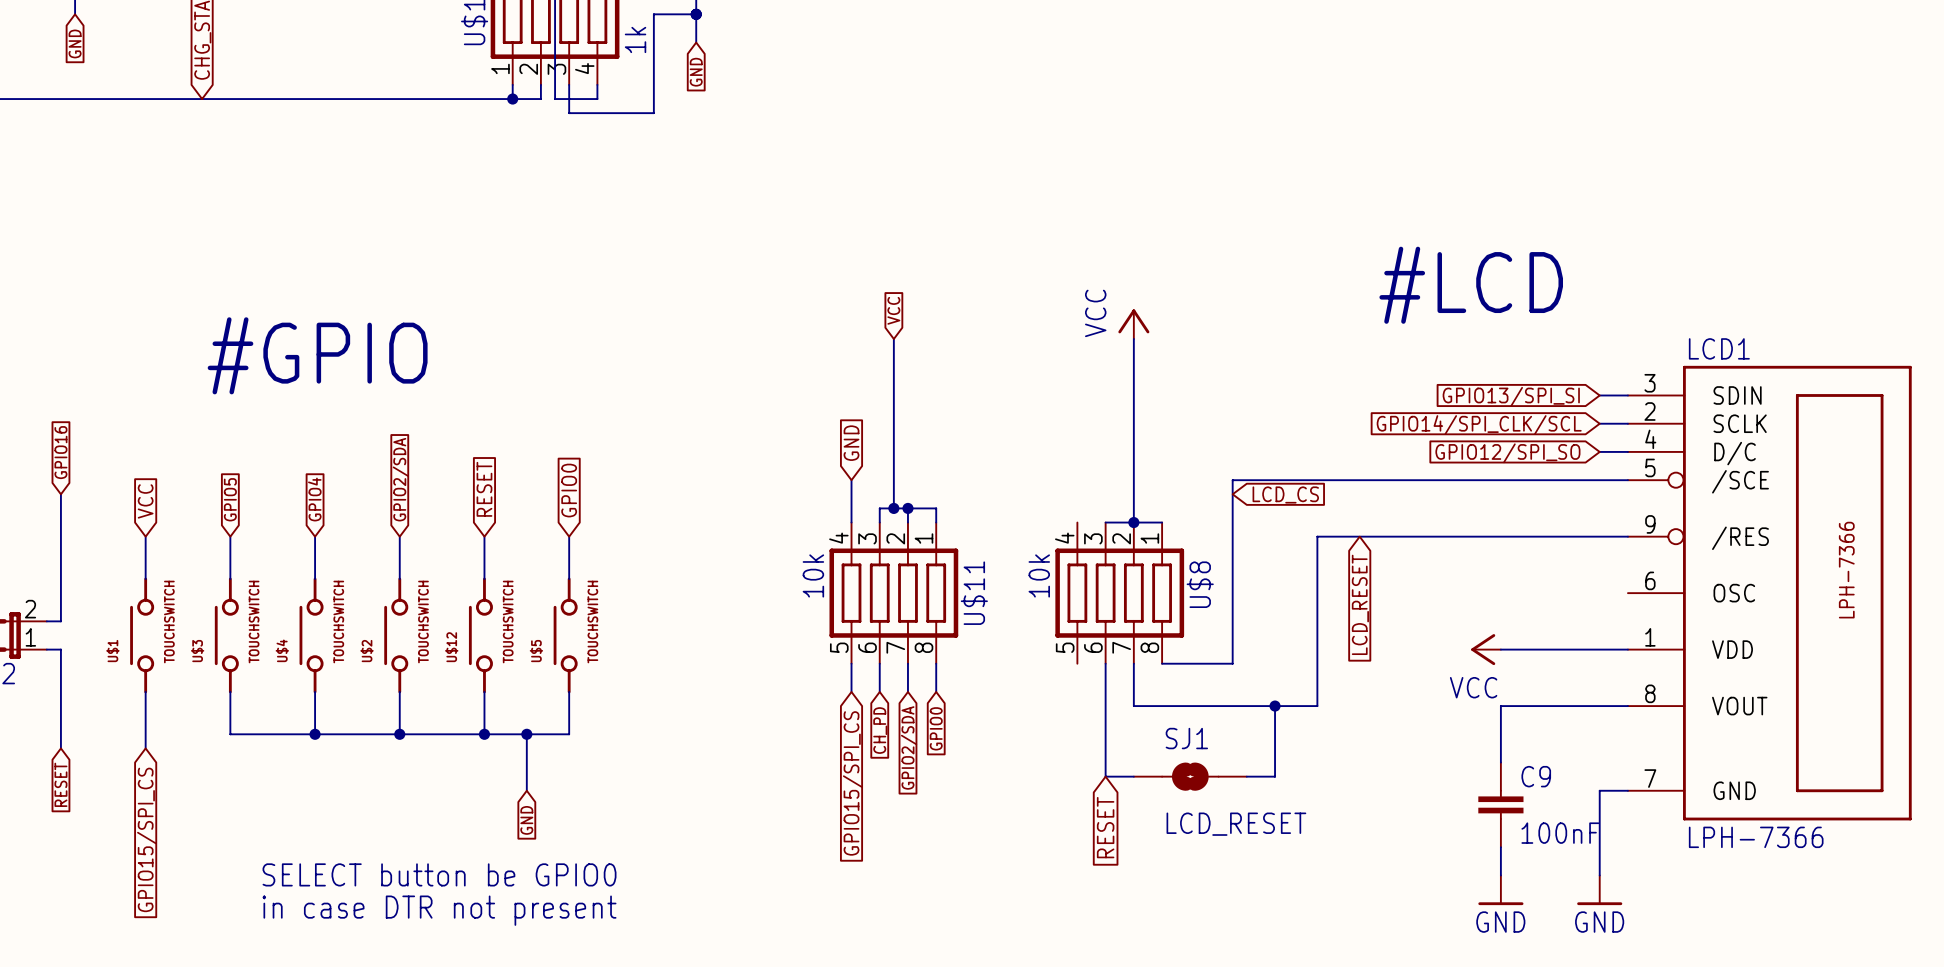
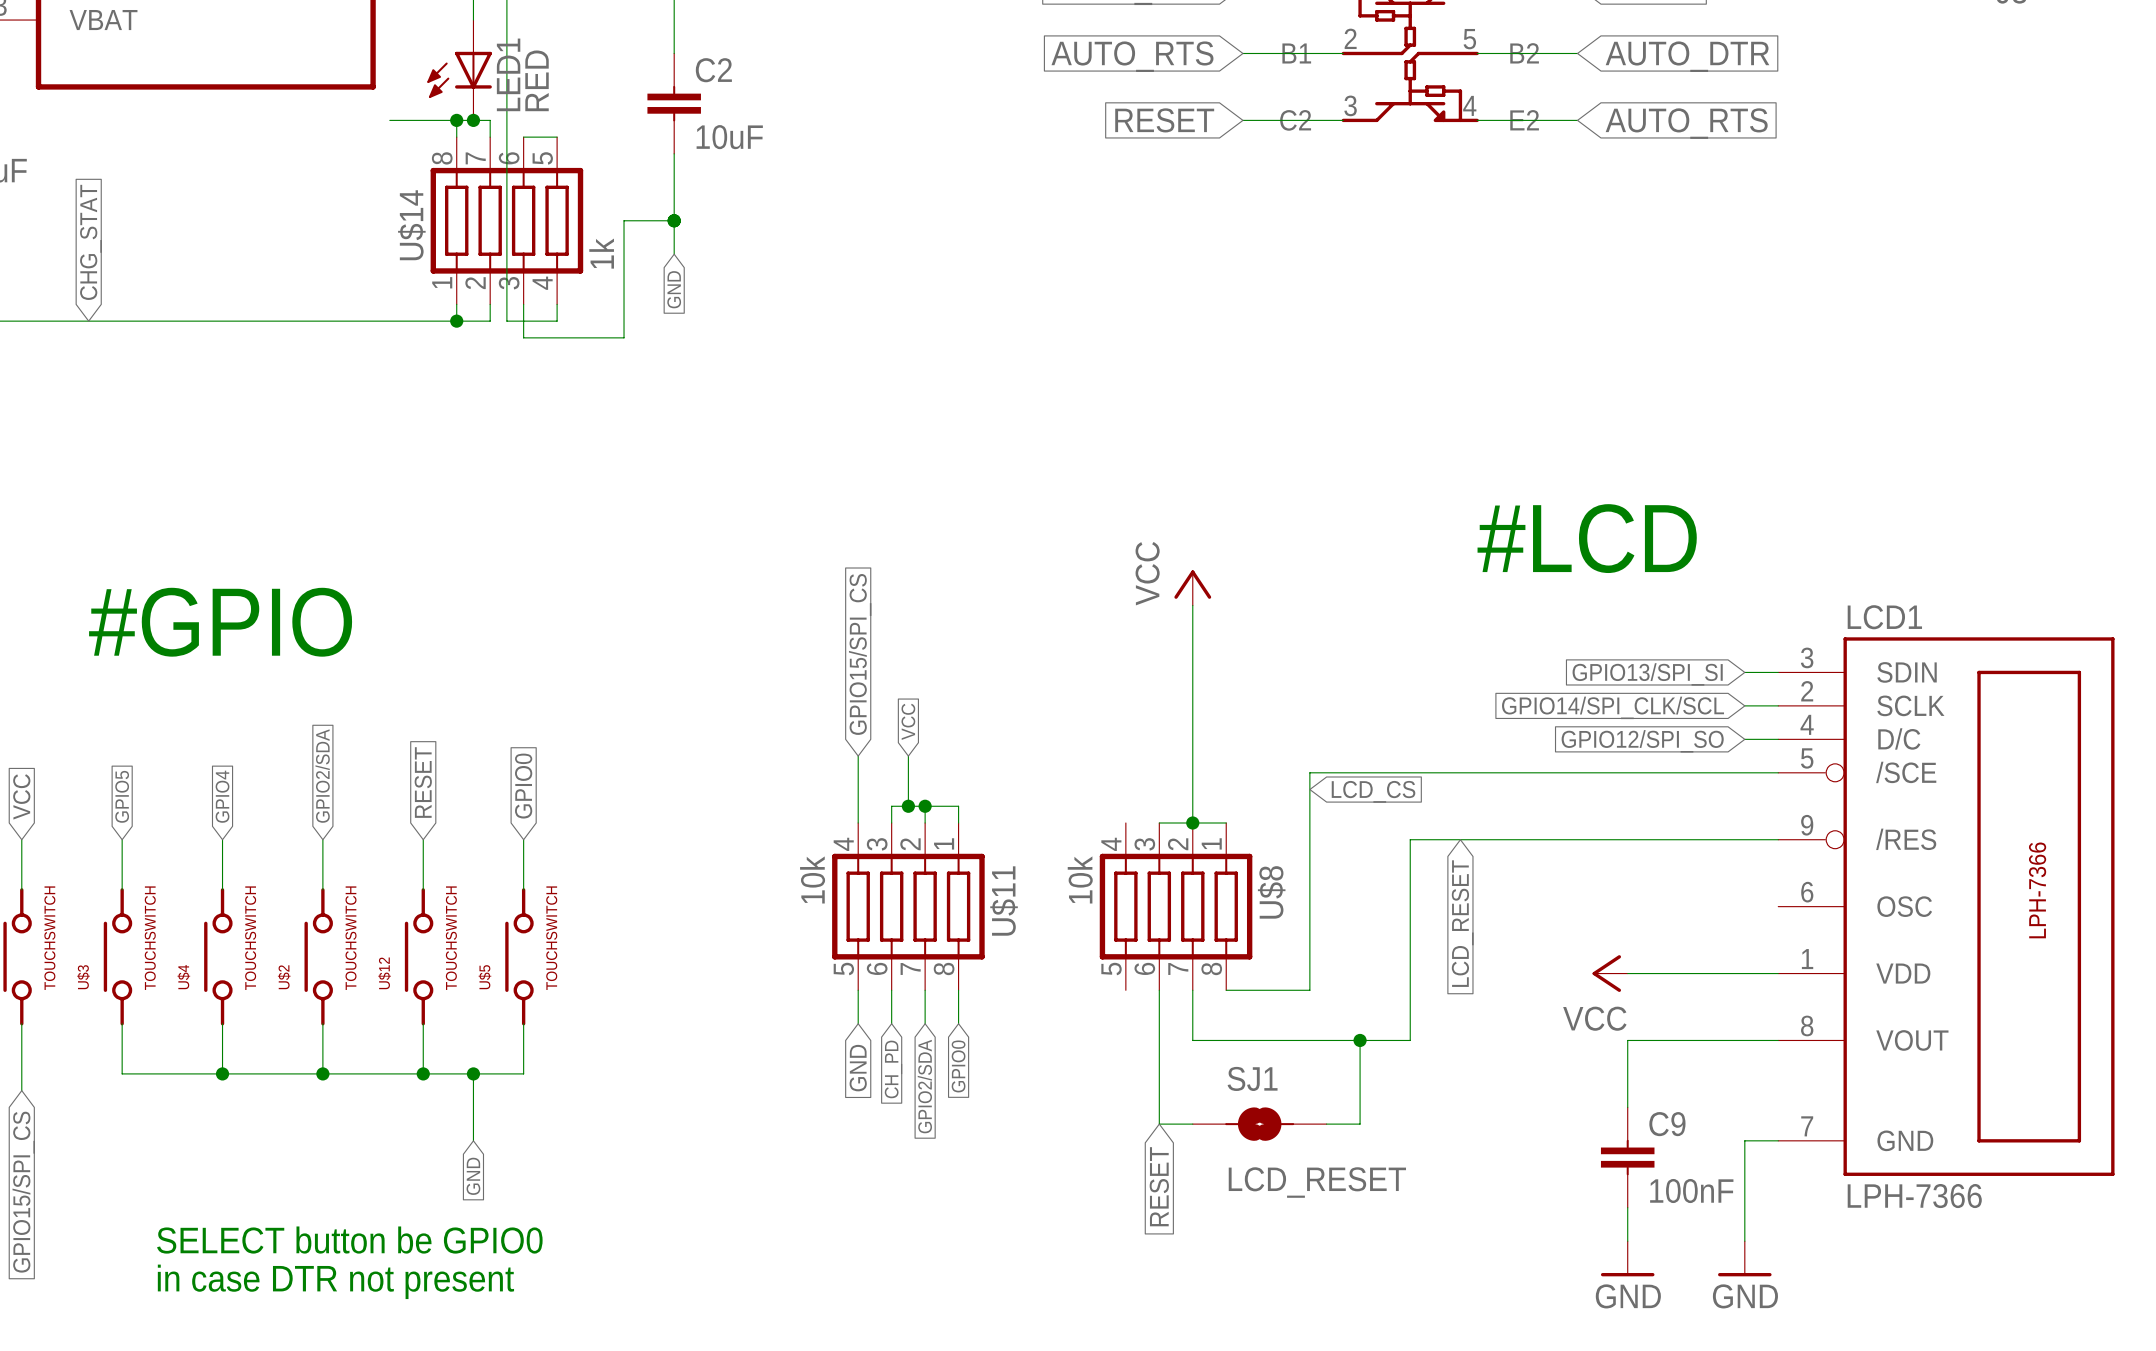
global label position: VCC (893, 310) -> VCC (908, 721)
wire: (893, 339) (893, 466) -> none
global label: none -> GPIO15/SPI_CS (860, 654)
global label: GND (851, 443) -> none
wire: none -> (858, 756) (858, 772)
global label: GPIO15/SPI_CS (852, 783) -> GND (858, 1068)

